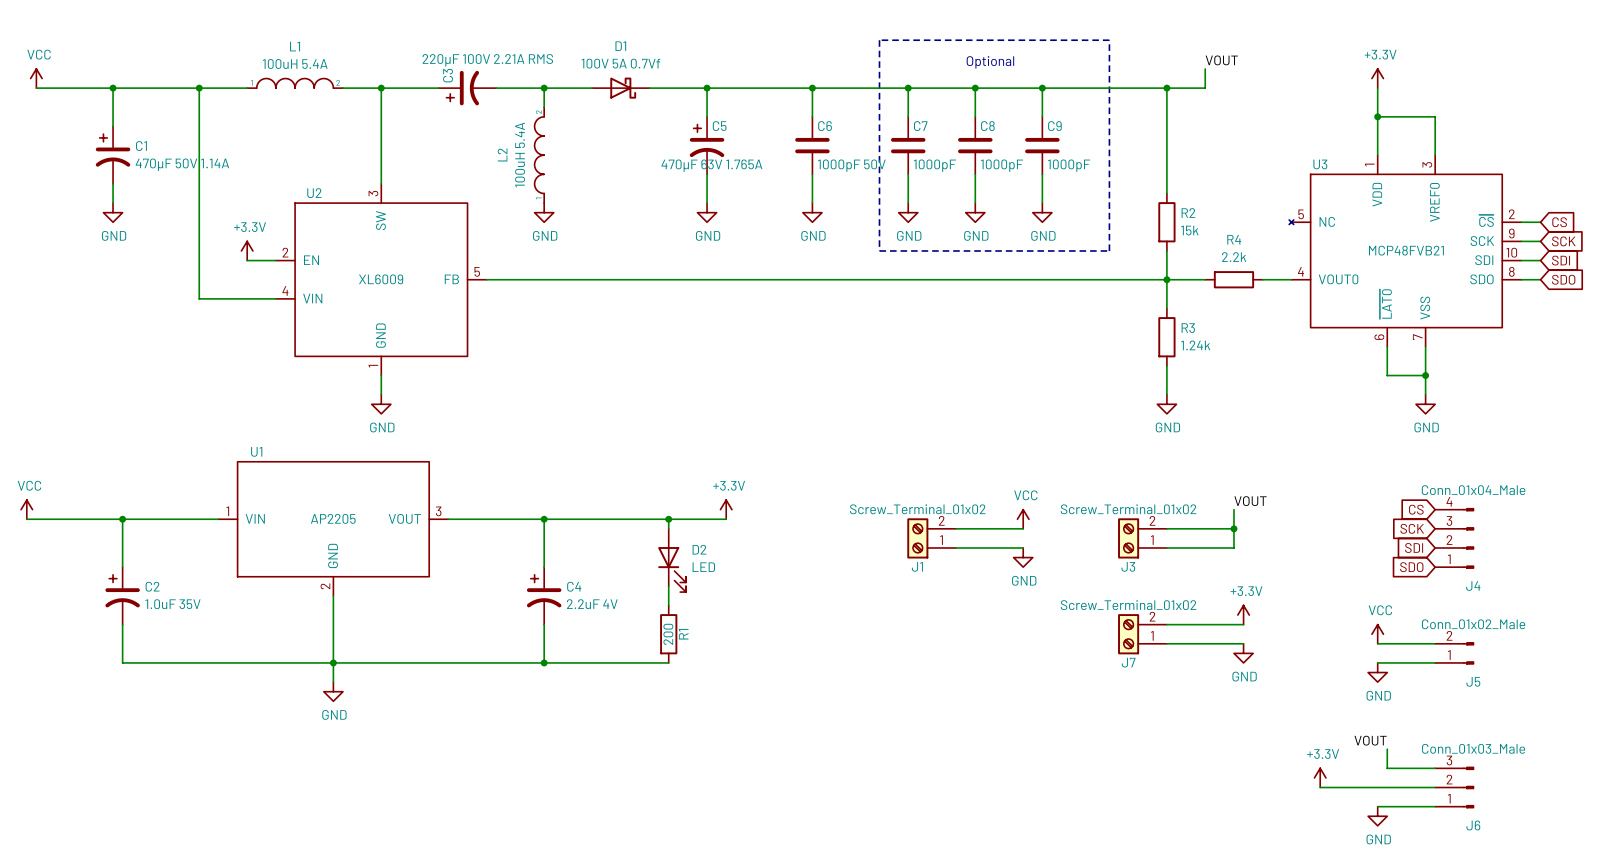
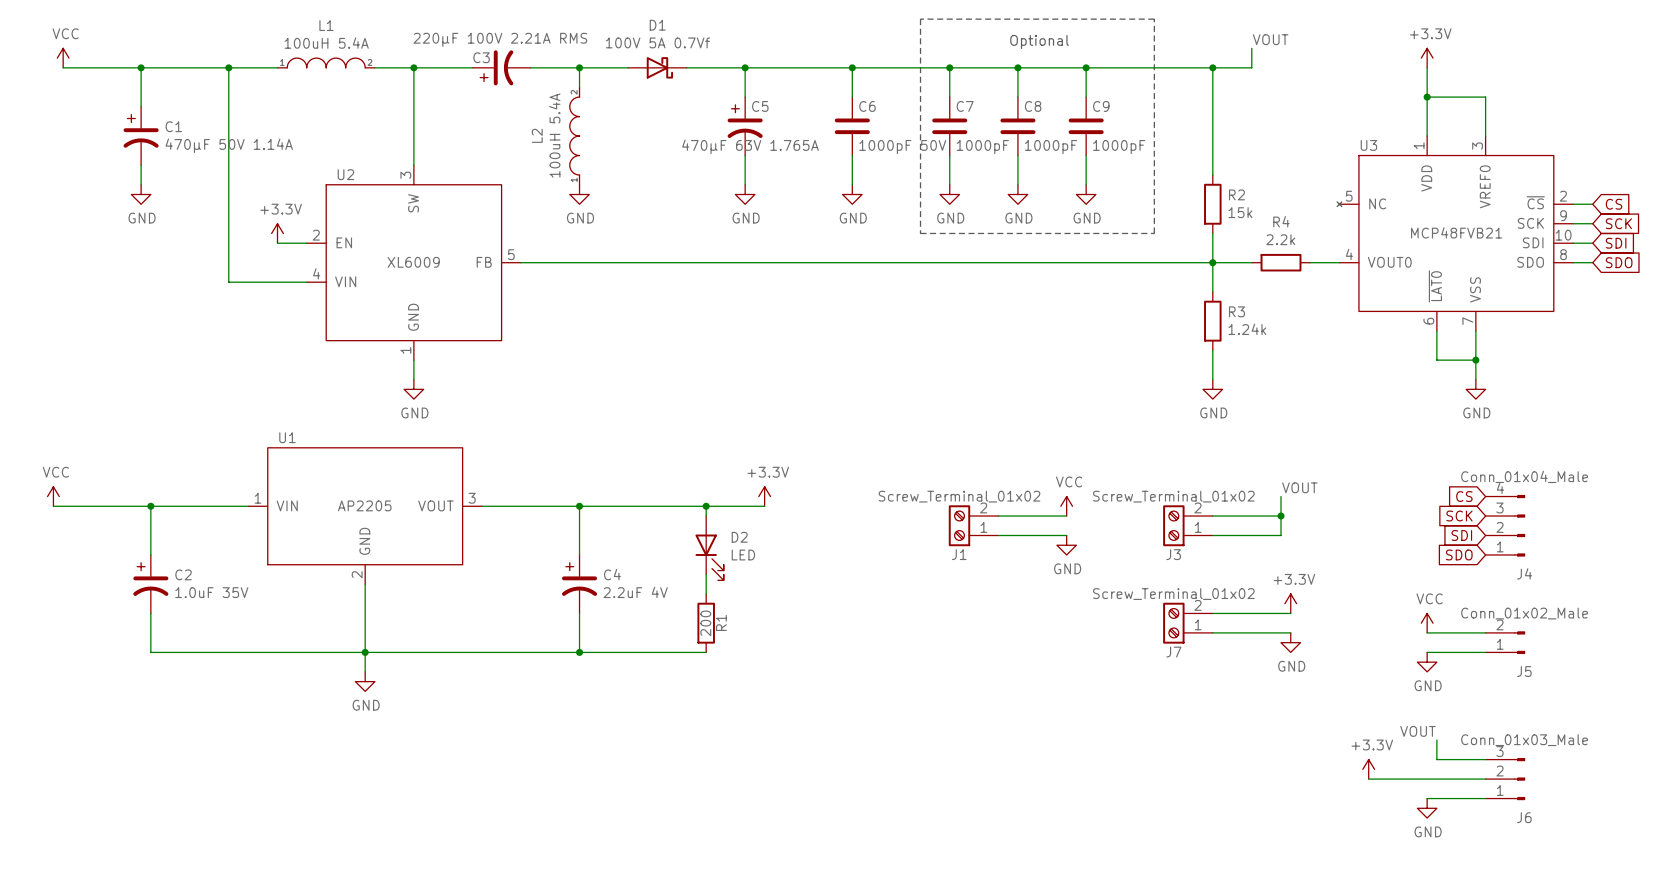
C3 name rotation: 0° (448, 75) -> 90° clockwise (481, 57)

